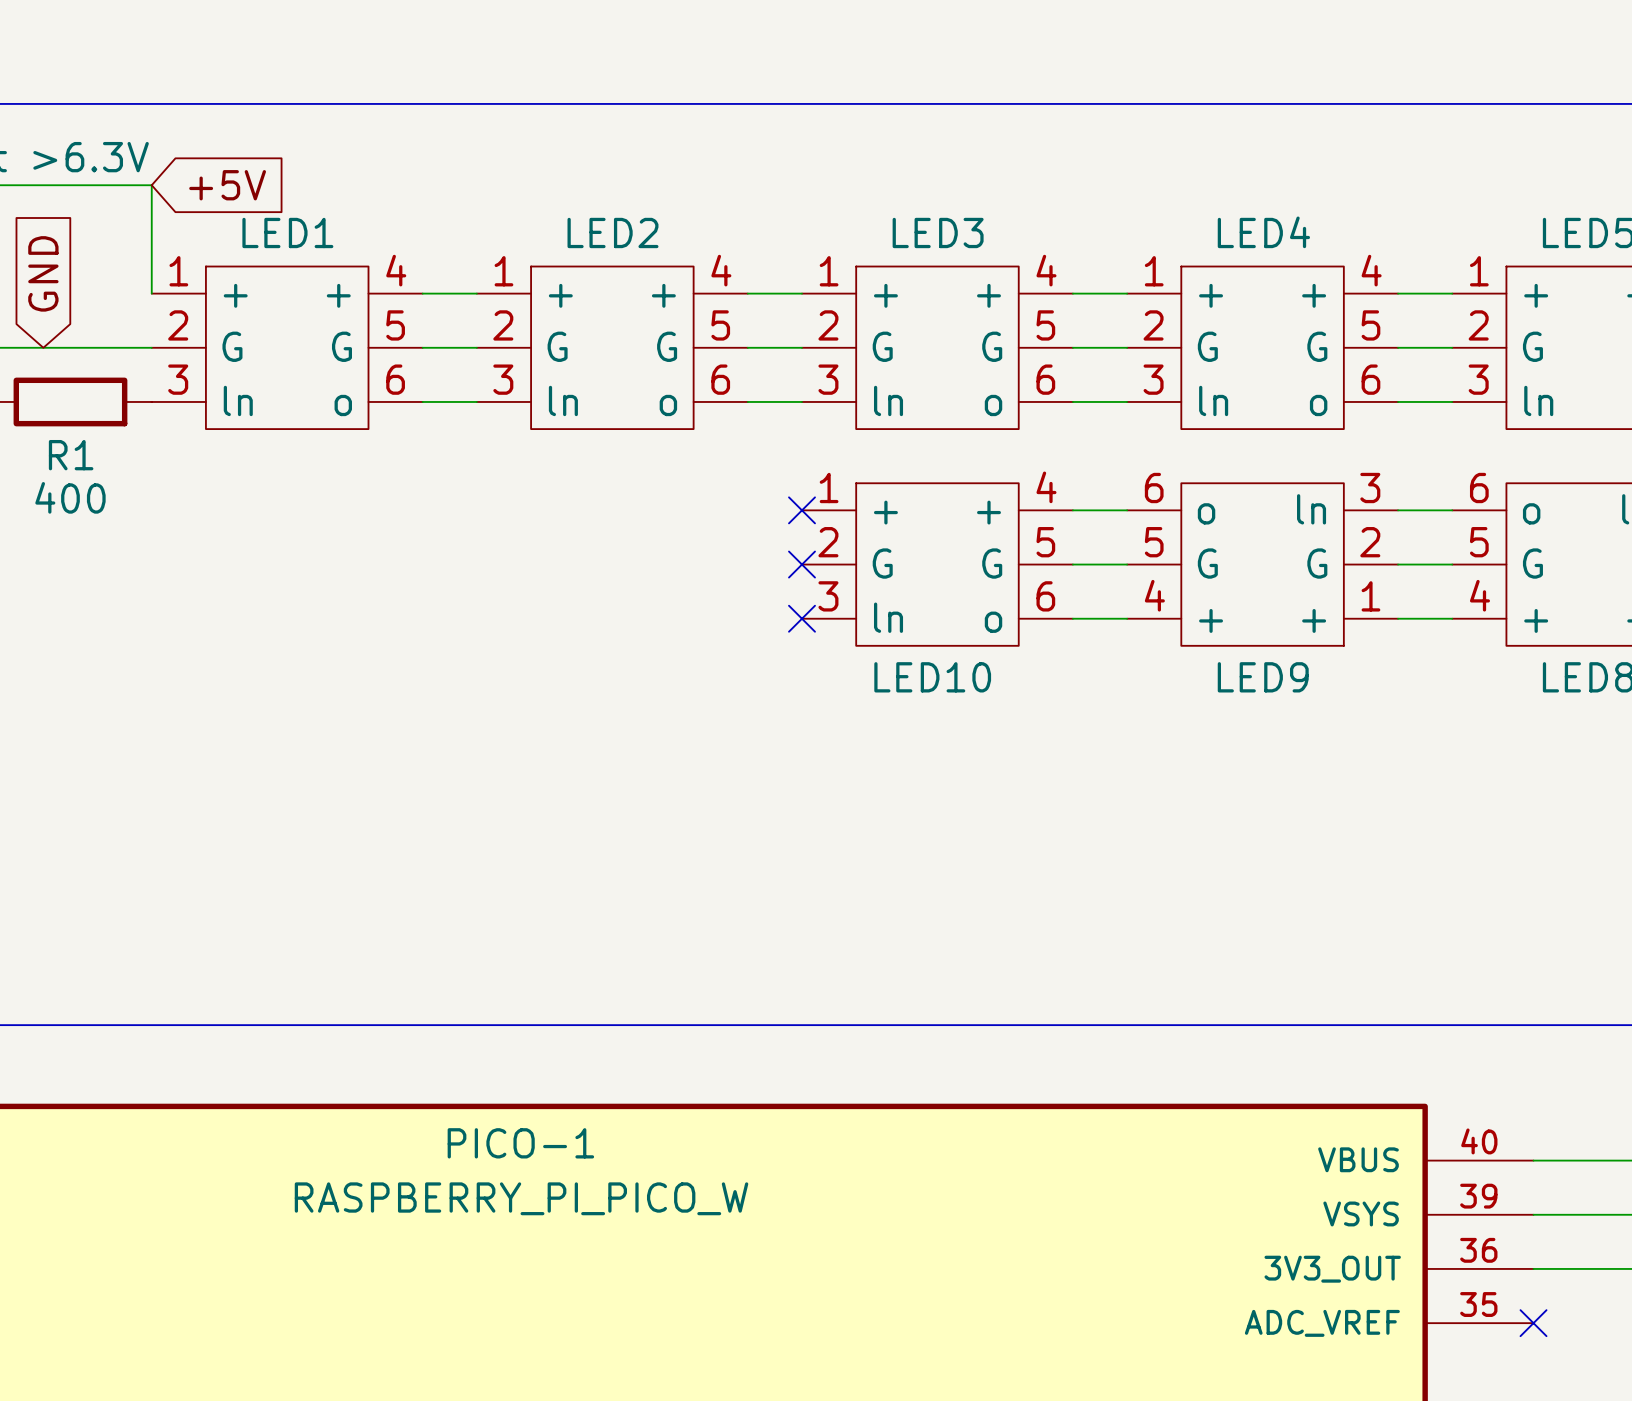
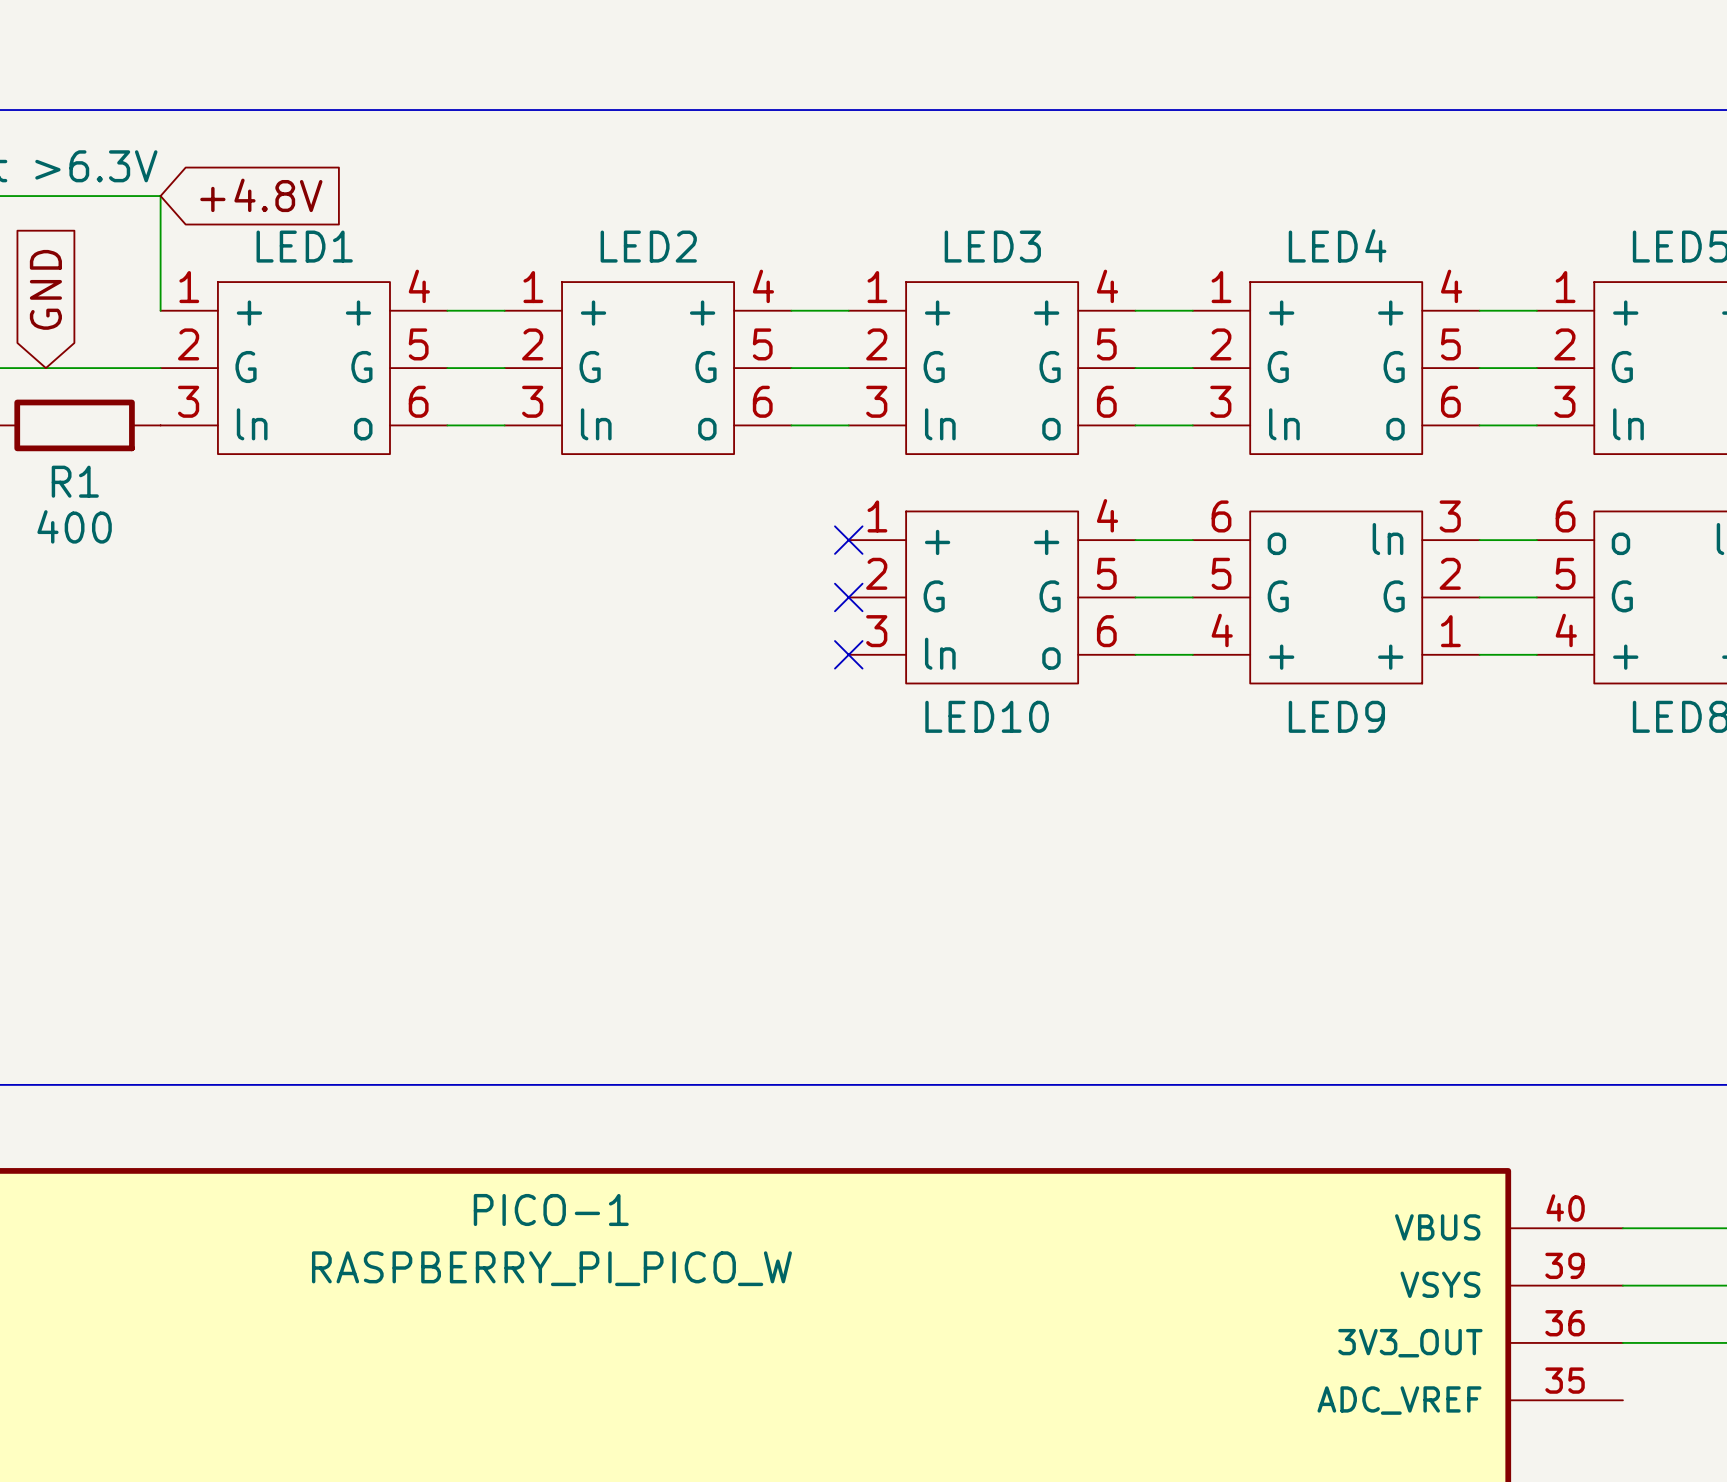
global label: +5V (227, 185) -> +4.8V (261, 195)
no-connect mark: (1533, 1323) -> none

